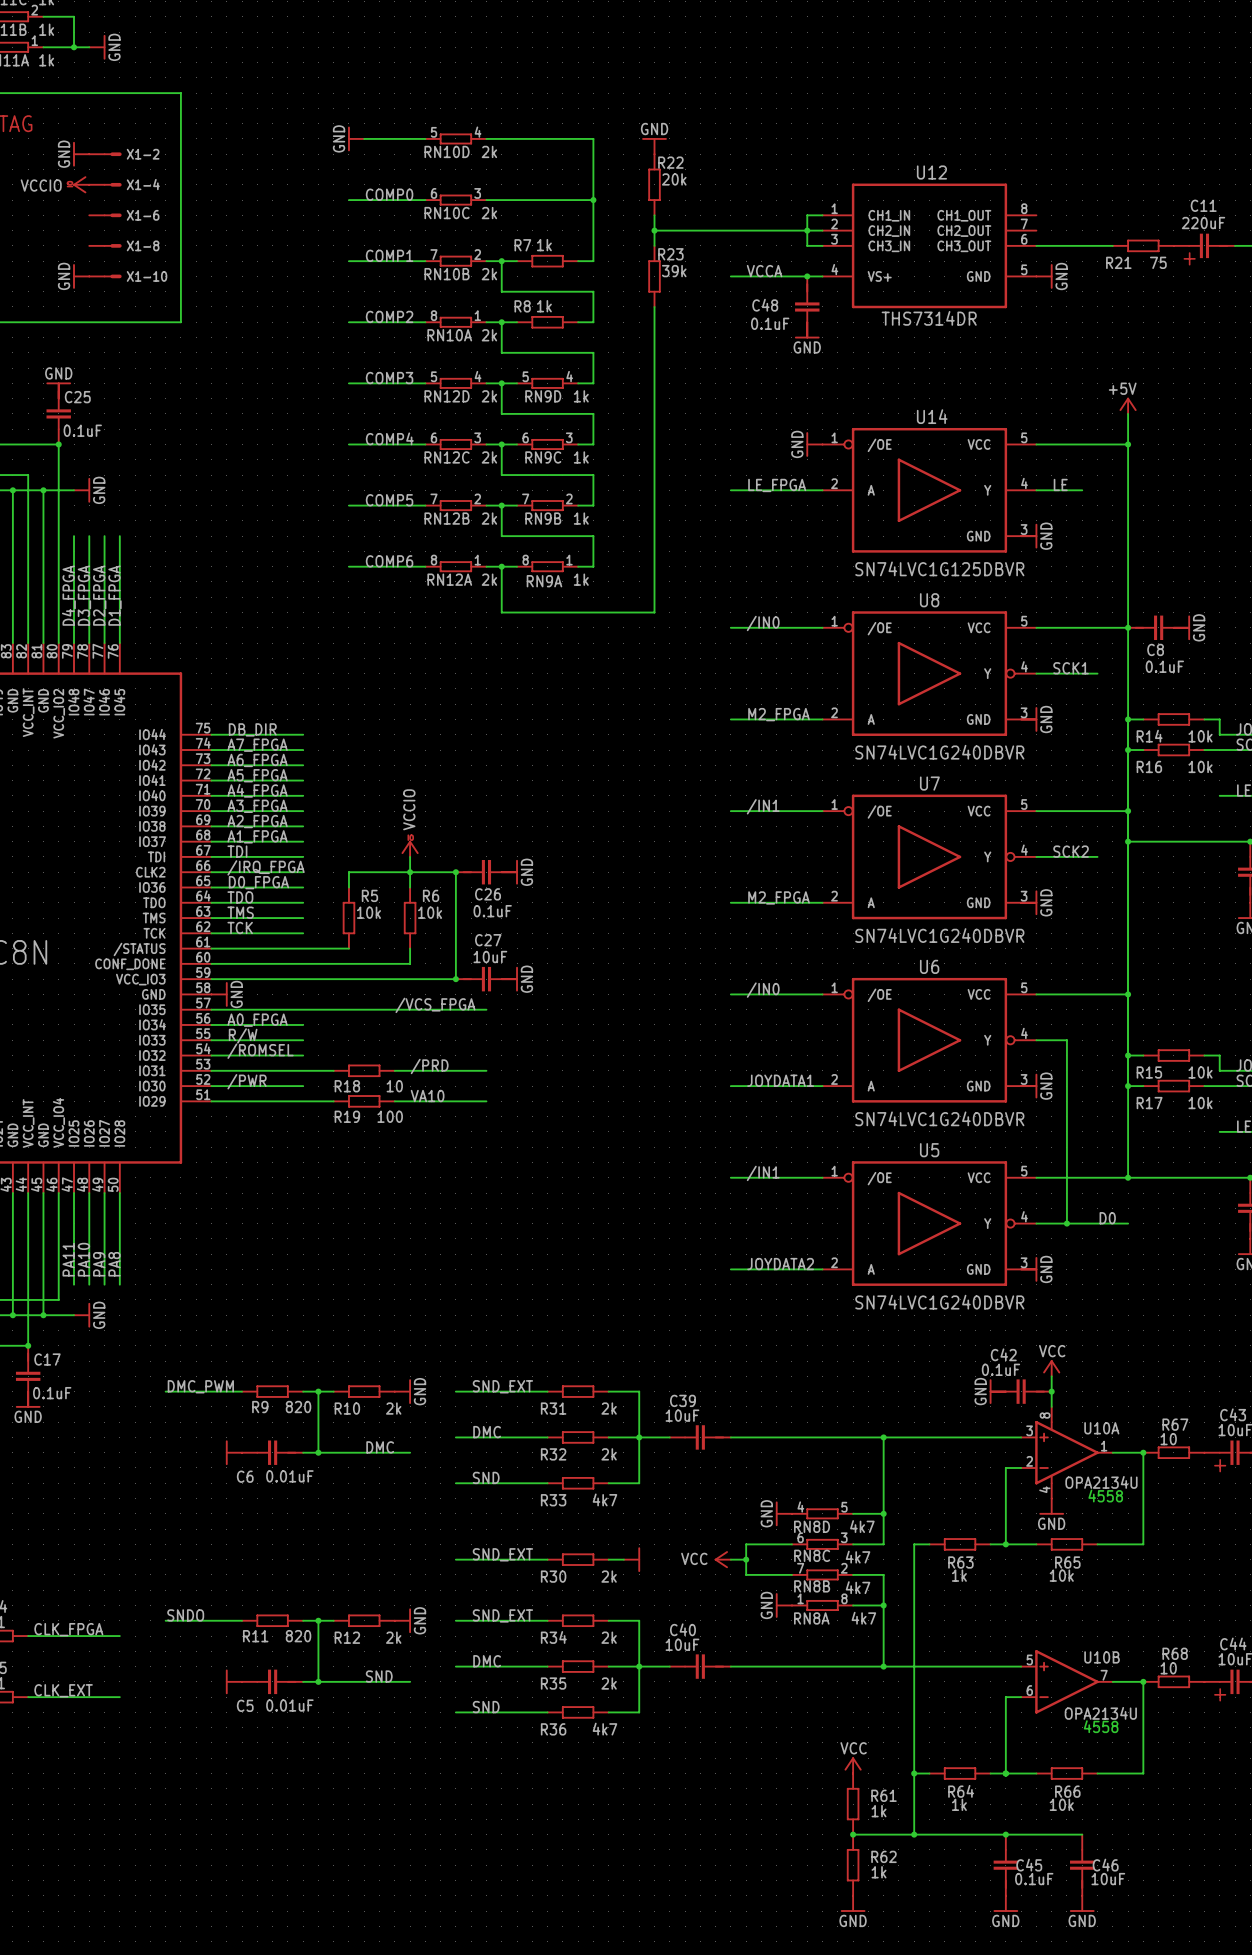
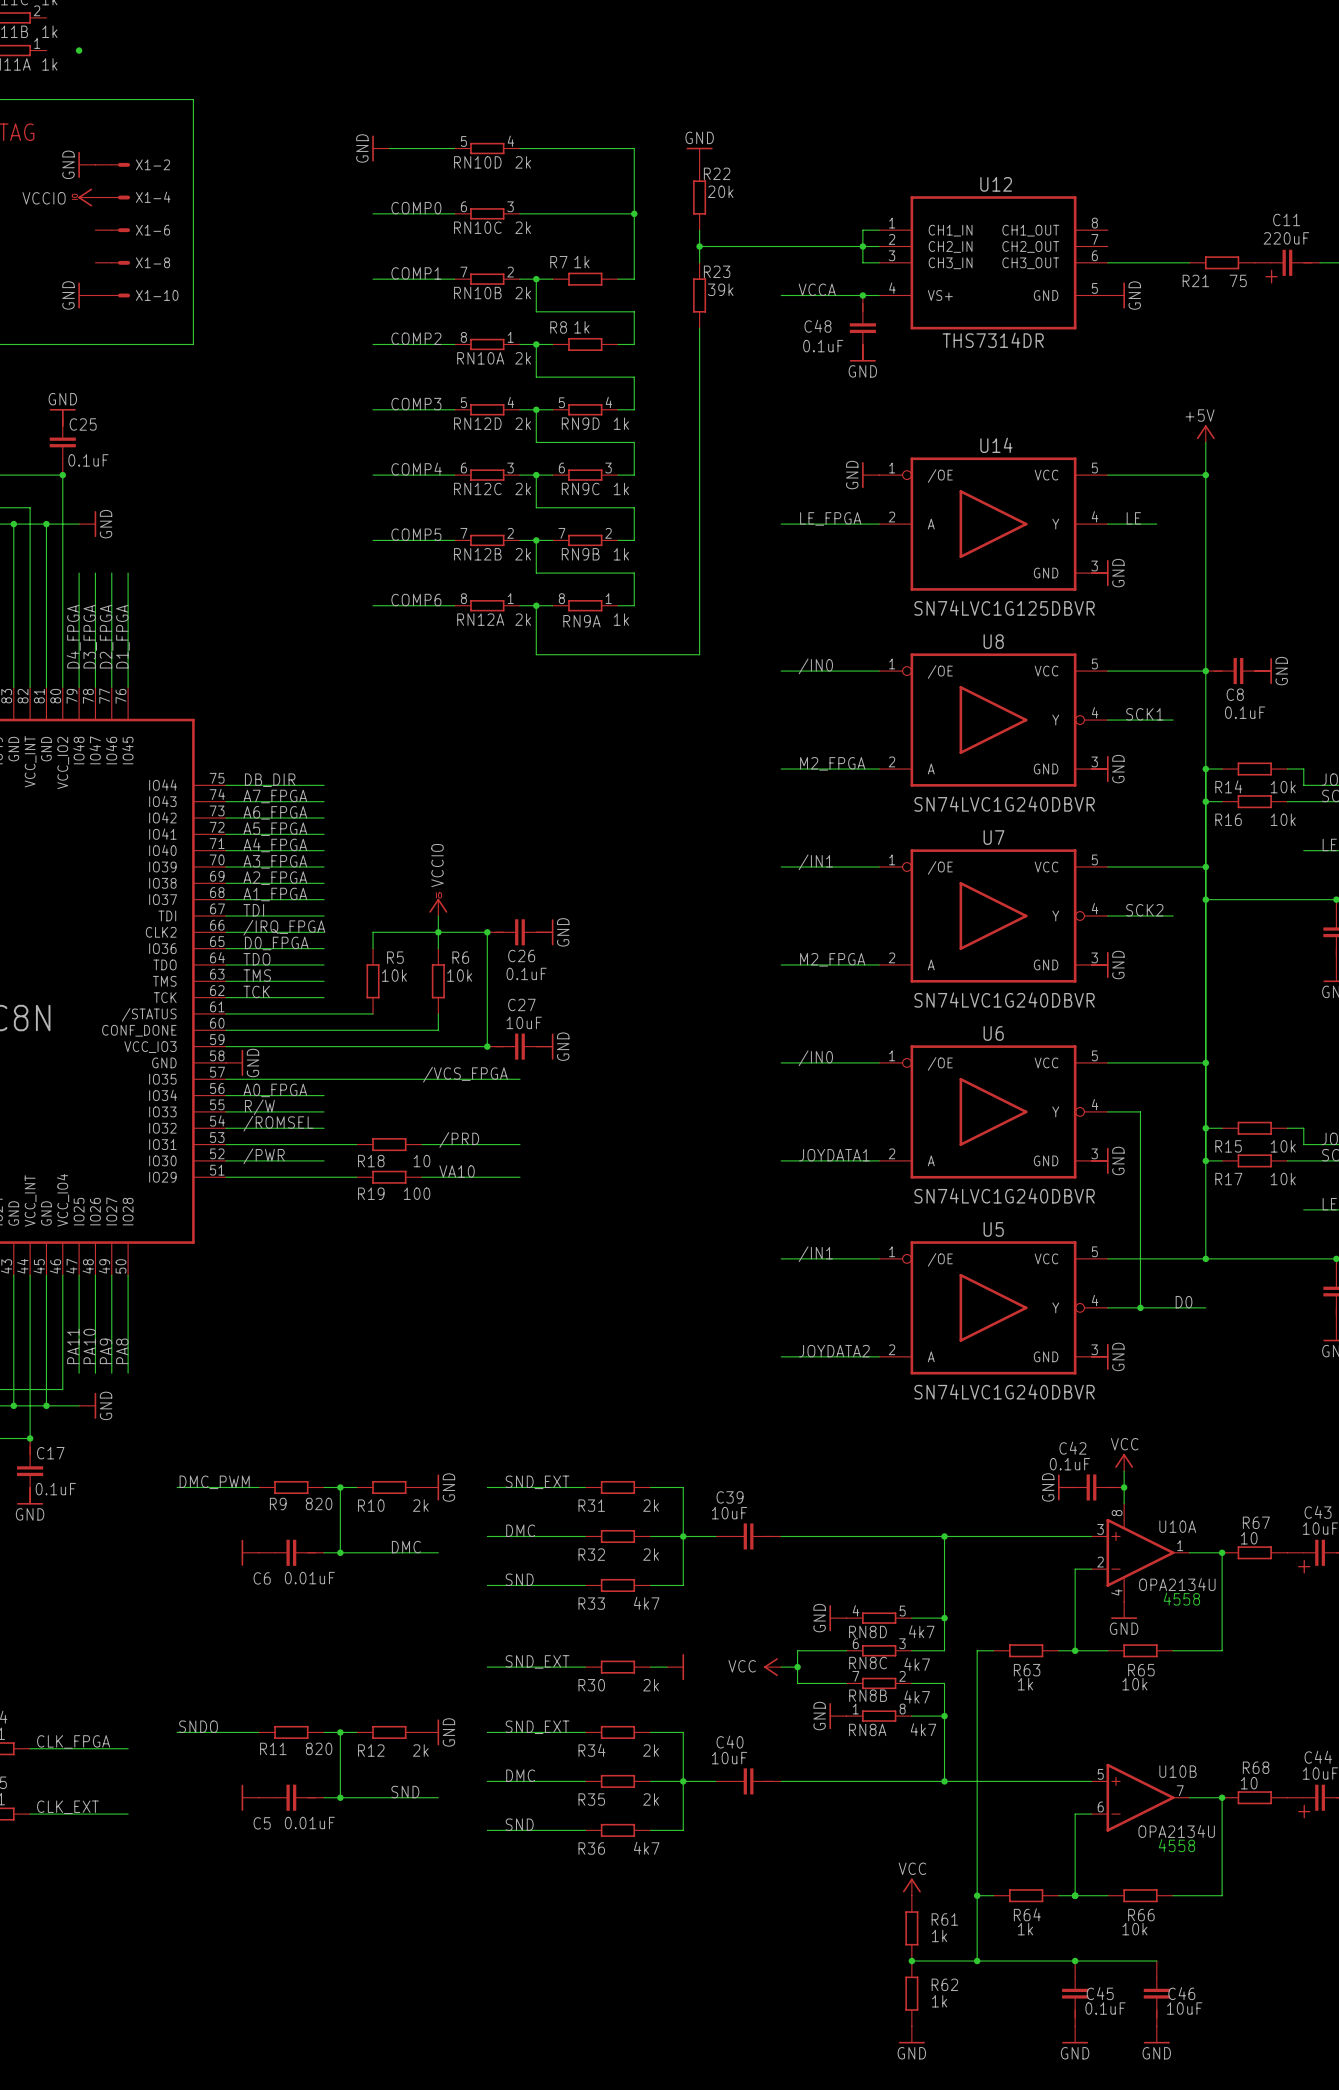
wire: (43, 16) (74, 16) (74, 47) -> none
wire: (43, 47) (89, 47) -> none
power symbol: GND (97, 47) -> none

